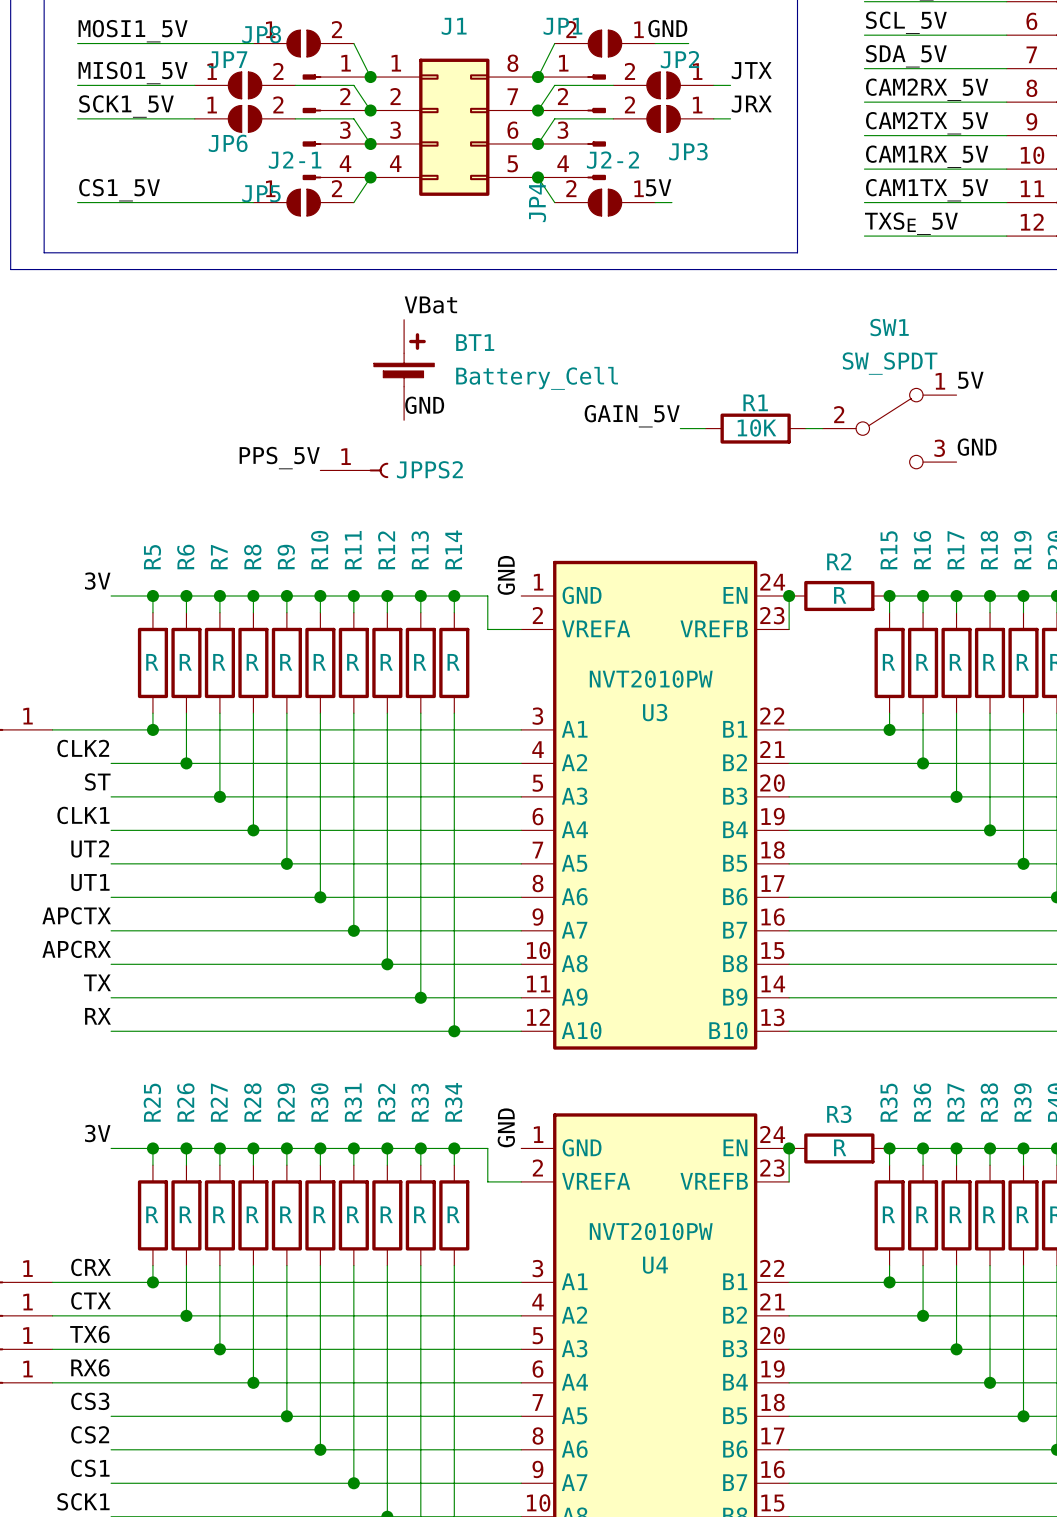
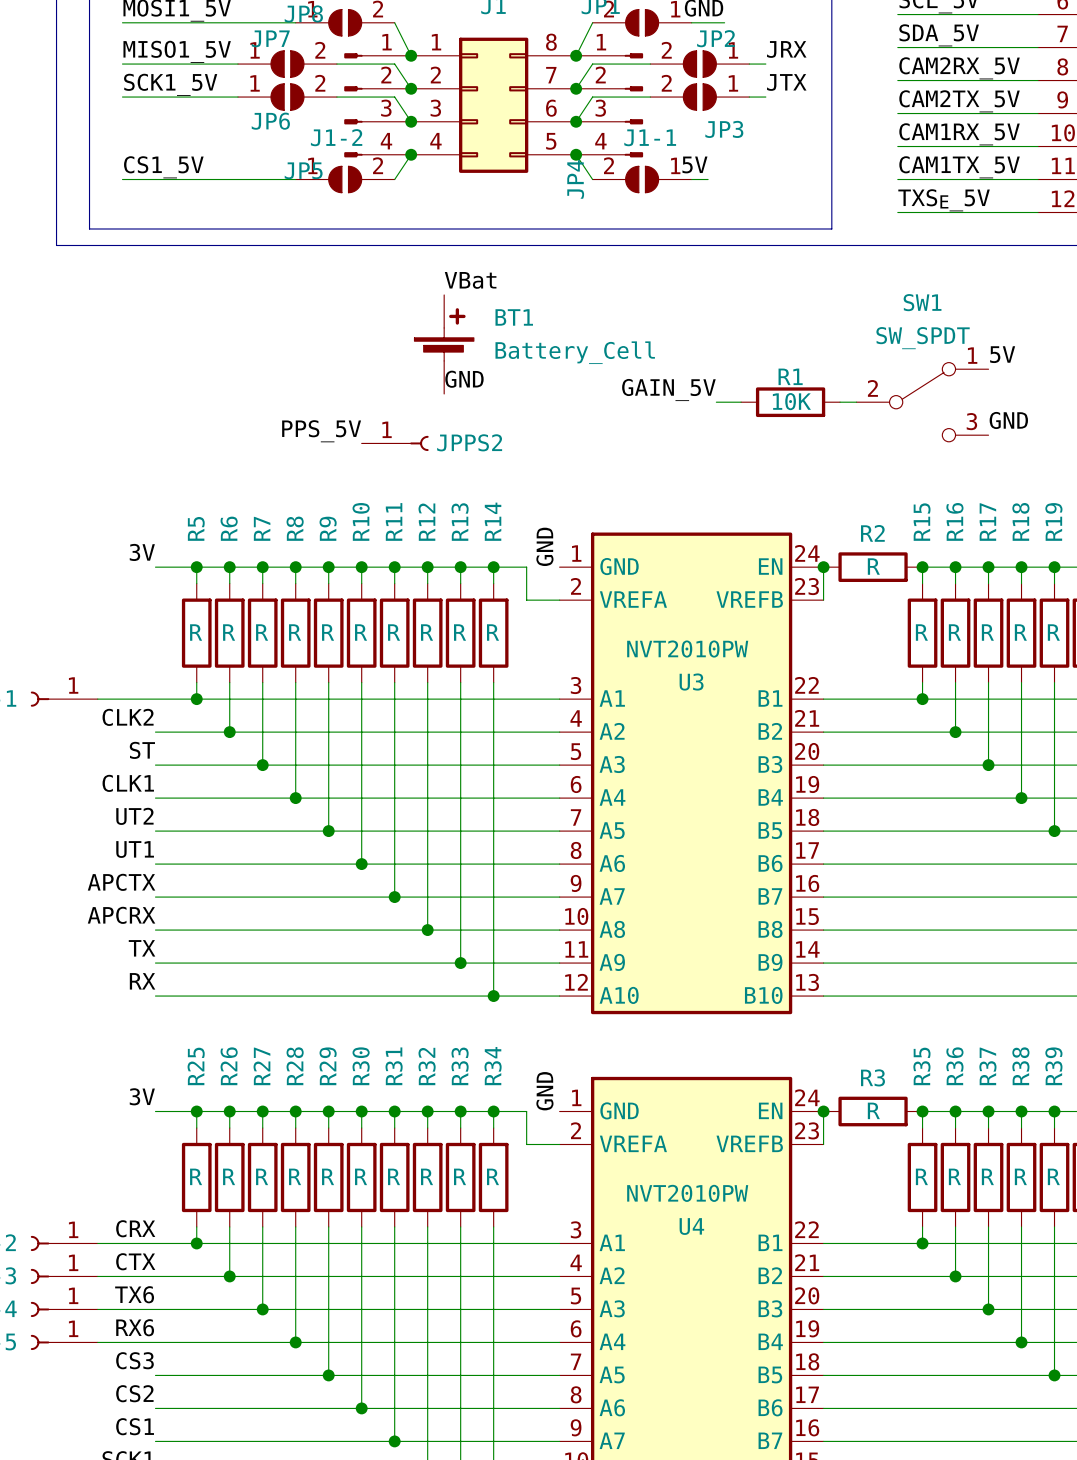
label: JTX (751, 70) -> JRX (786, 49)
label: JRX (751, 104) -> JTX (786, 82)
J2-1 name: J2-1 (295, 160) -> J1-2 (336, 137)
J2-2 name: J2-2 (612, 160) -> J1-1 (650, 137)

